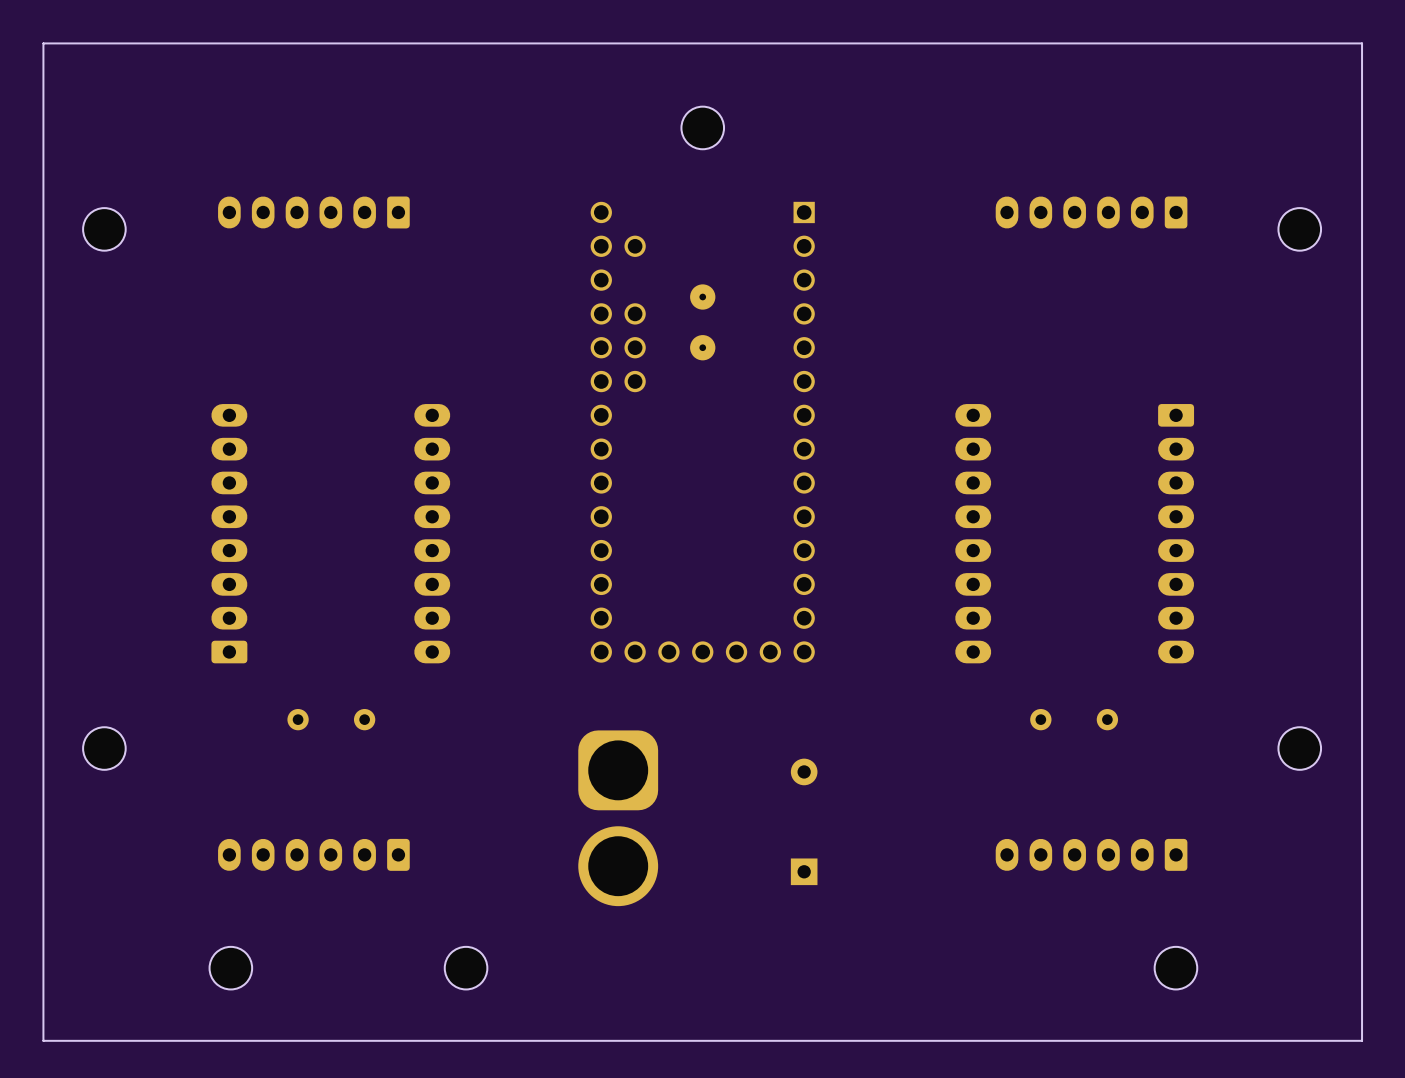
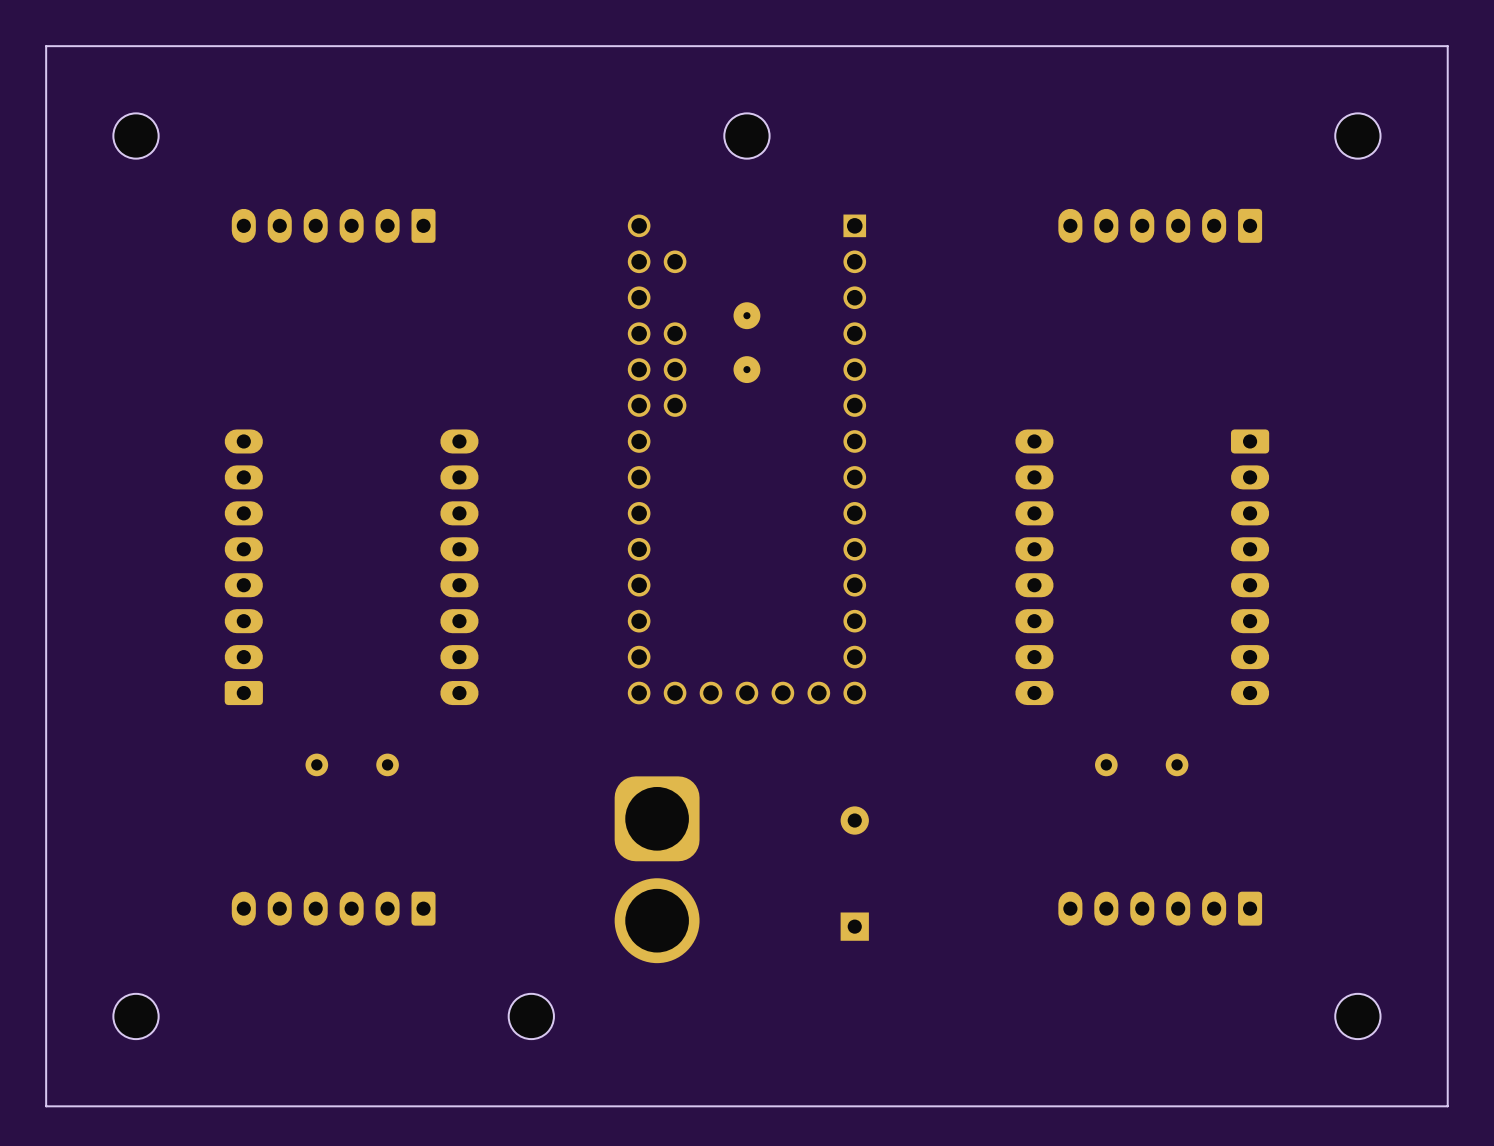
part position: (104, 229) -> (136, 136)
part position: (1299, 229) -> (1357, 136)
part: (104, 748) -> none
part: (1299, 748) -> none
part position: (230, 968) -> (136, 1016)
part position: (466, 968) -> (531, 1016)
part position: (1175, 968) -> (1357, 1016)

